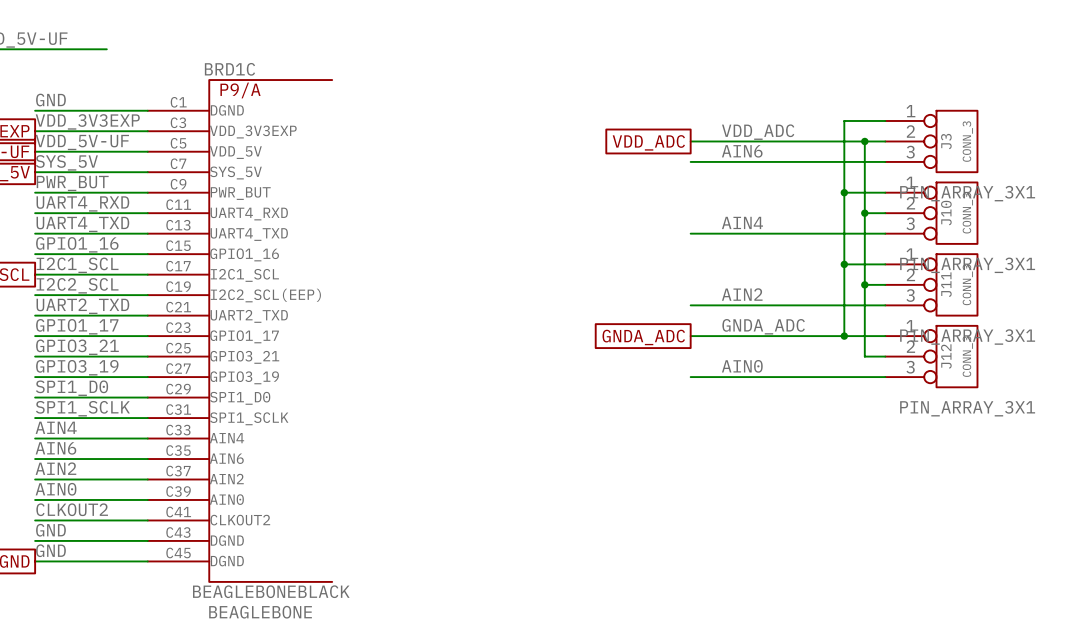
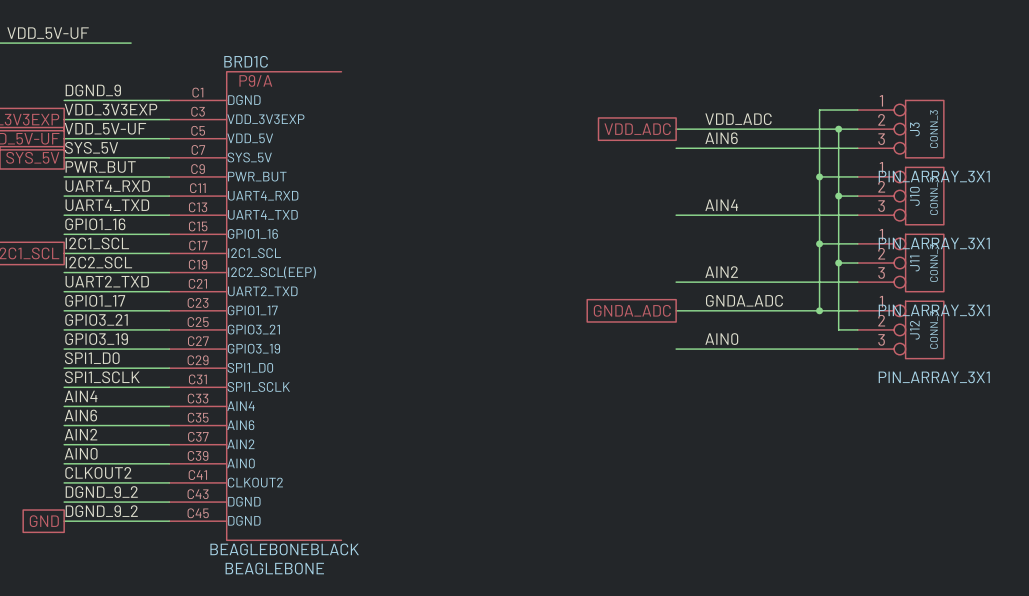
label: GND (50, 100) -> DGND_9 (93, 90)
label: GND (50, 530) -> DGND_9_2 (101, 492)
label: GND (50, 550) -> DGND_9_2 (101, 511)

